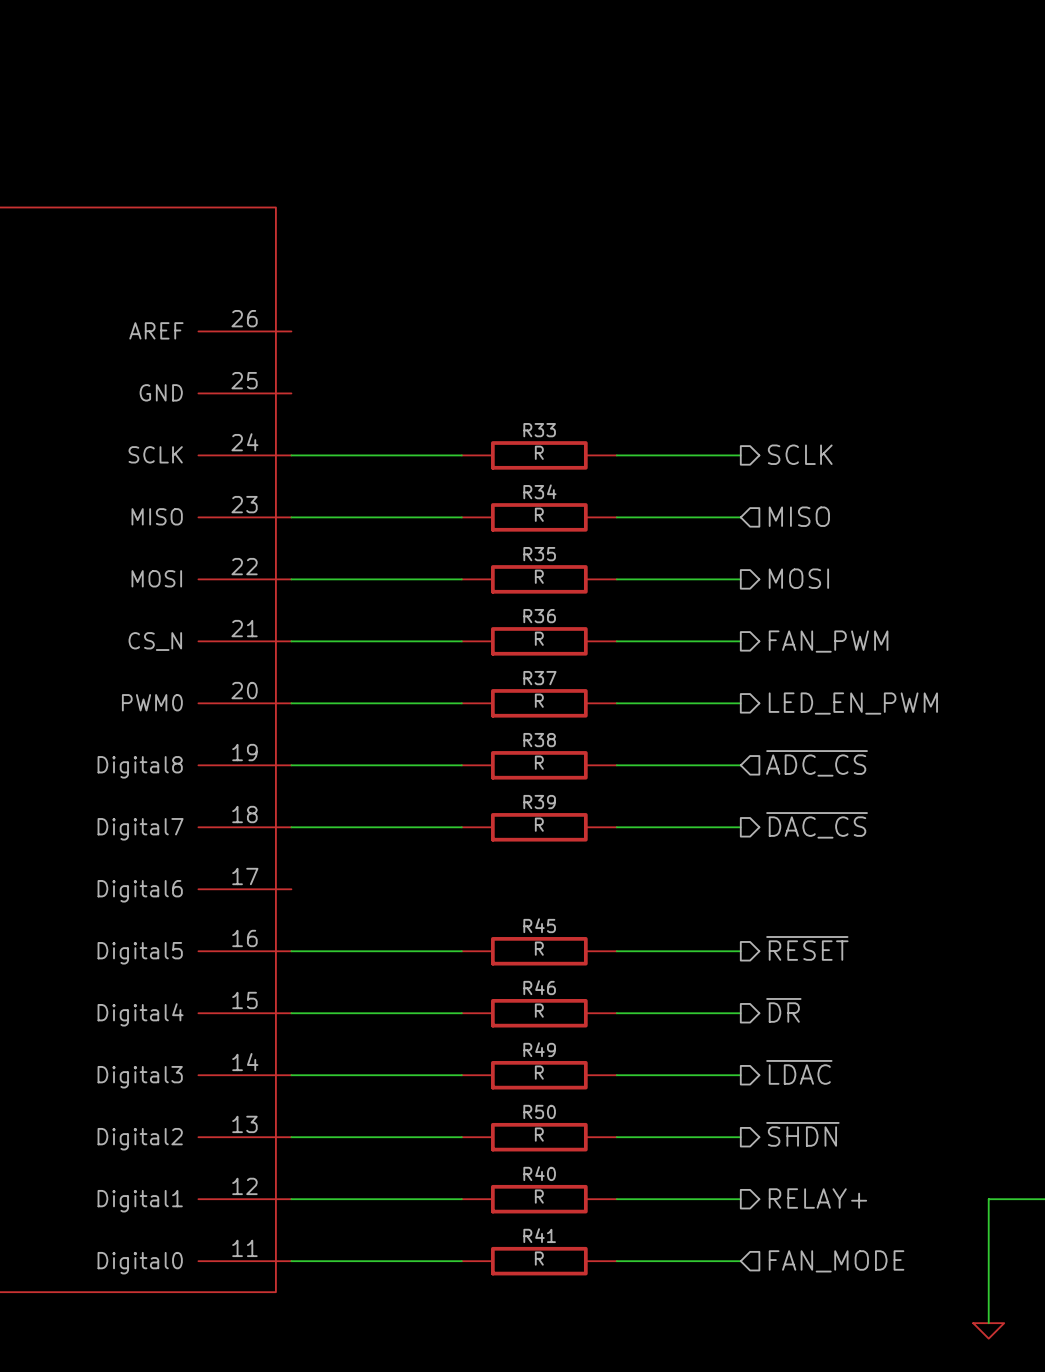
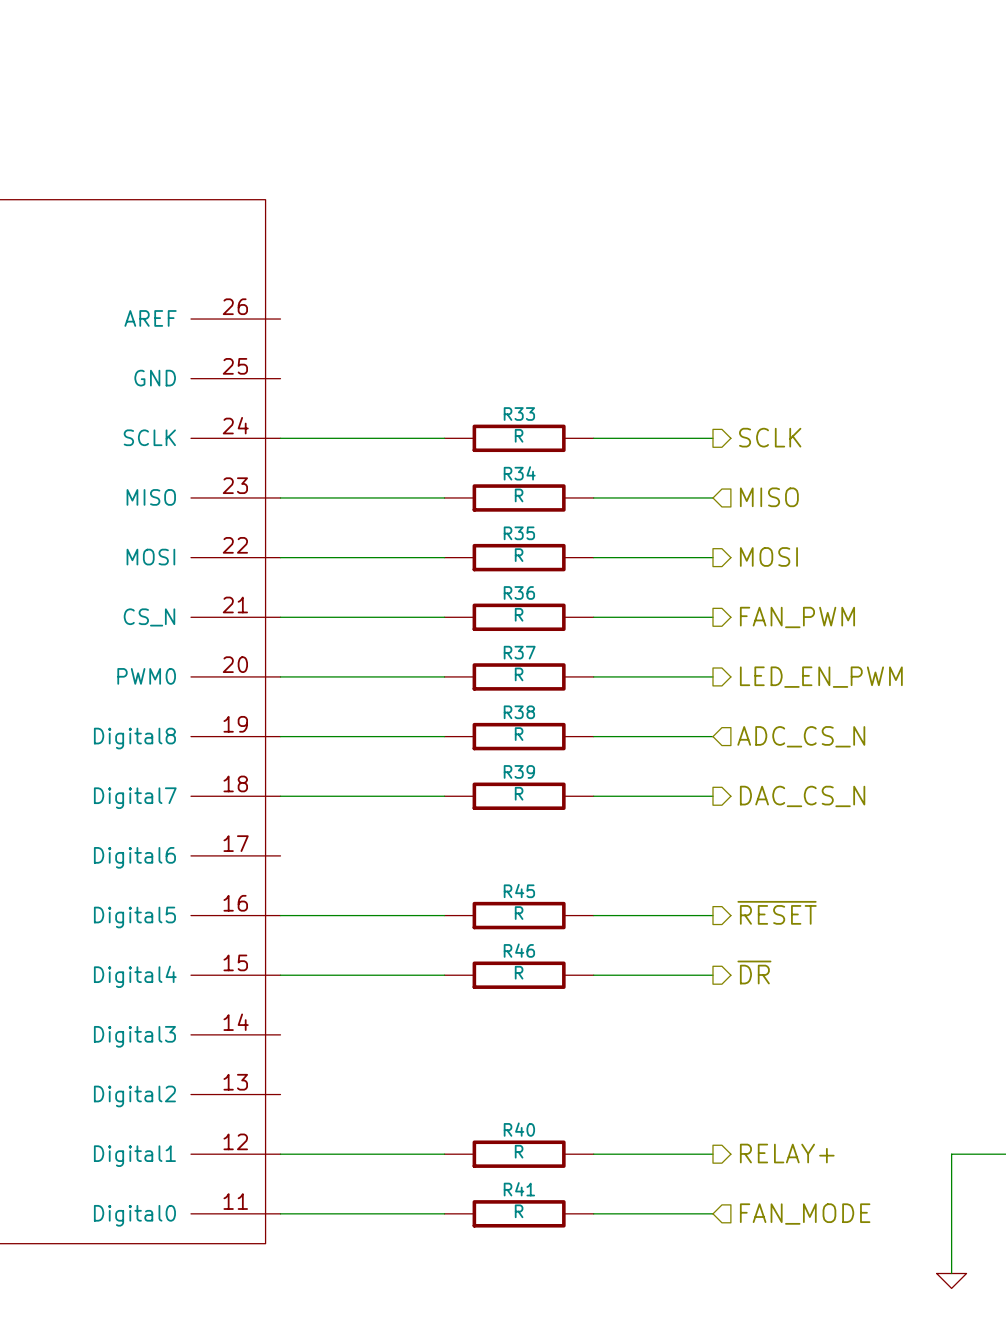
hierarchical label: ~{ADC_CS} (817, 763) -> ADC_CS_N (801, 736)
hierarchical label: ~{DAC_CS} (817, 825) -> DAC_CS_N (802, 796)
hierarchical label: ~{LDAC} (799, 1072) -> none
wire: (291, 1075) (461, 1075) -> none
R49: R (539, 1075) -> none
wire: (616, 1075) (740, 1075) -> none
hierarchical label: ~{SHDN} (802, 1134) -> none
wire: (291, 1137) (461, 1137) -> none
R50: R (539, 1137) -> none
wire: (616, 1137) (740, 1137) -> none

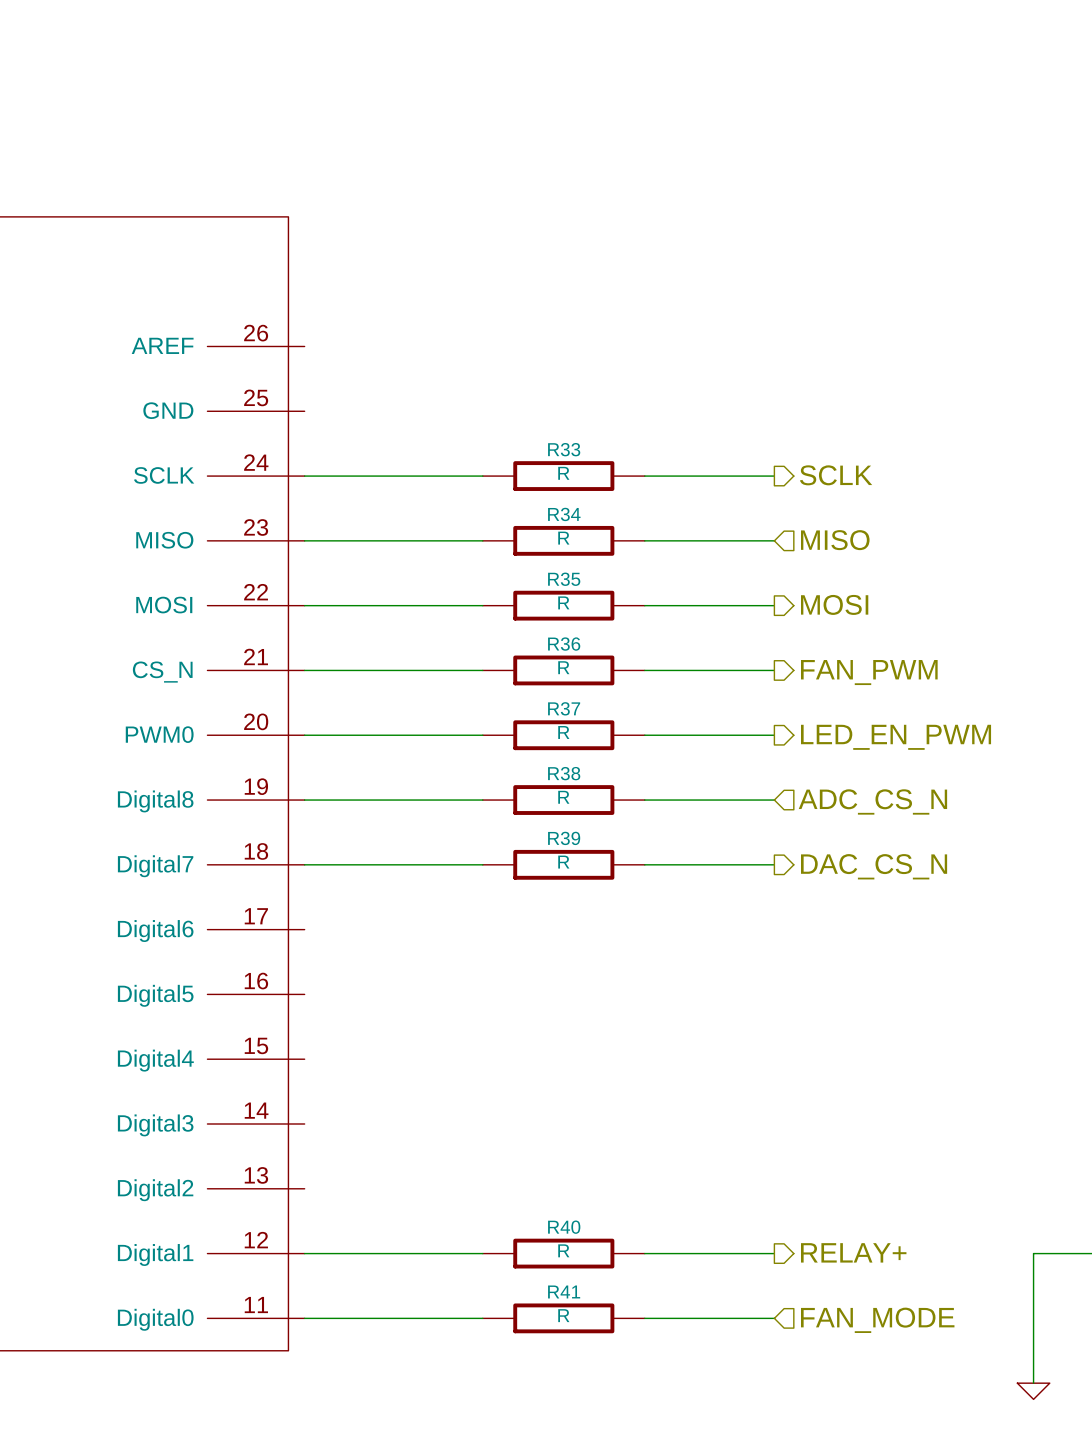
hierarchical label: ~{RESET} (777, 912) -> none
wire: (280, 915) (444, 915) -> none
R45: R (519, 915) -> none
wire: (593, 915) (712, 915) -> none
hierarchical label: ~{DR} (754, 972) -> none
wire: (280, 975) (444, 975) -> none
R46: R (519, 975) -> none
wire: (593, 975) (712, 975) -> none

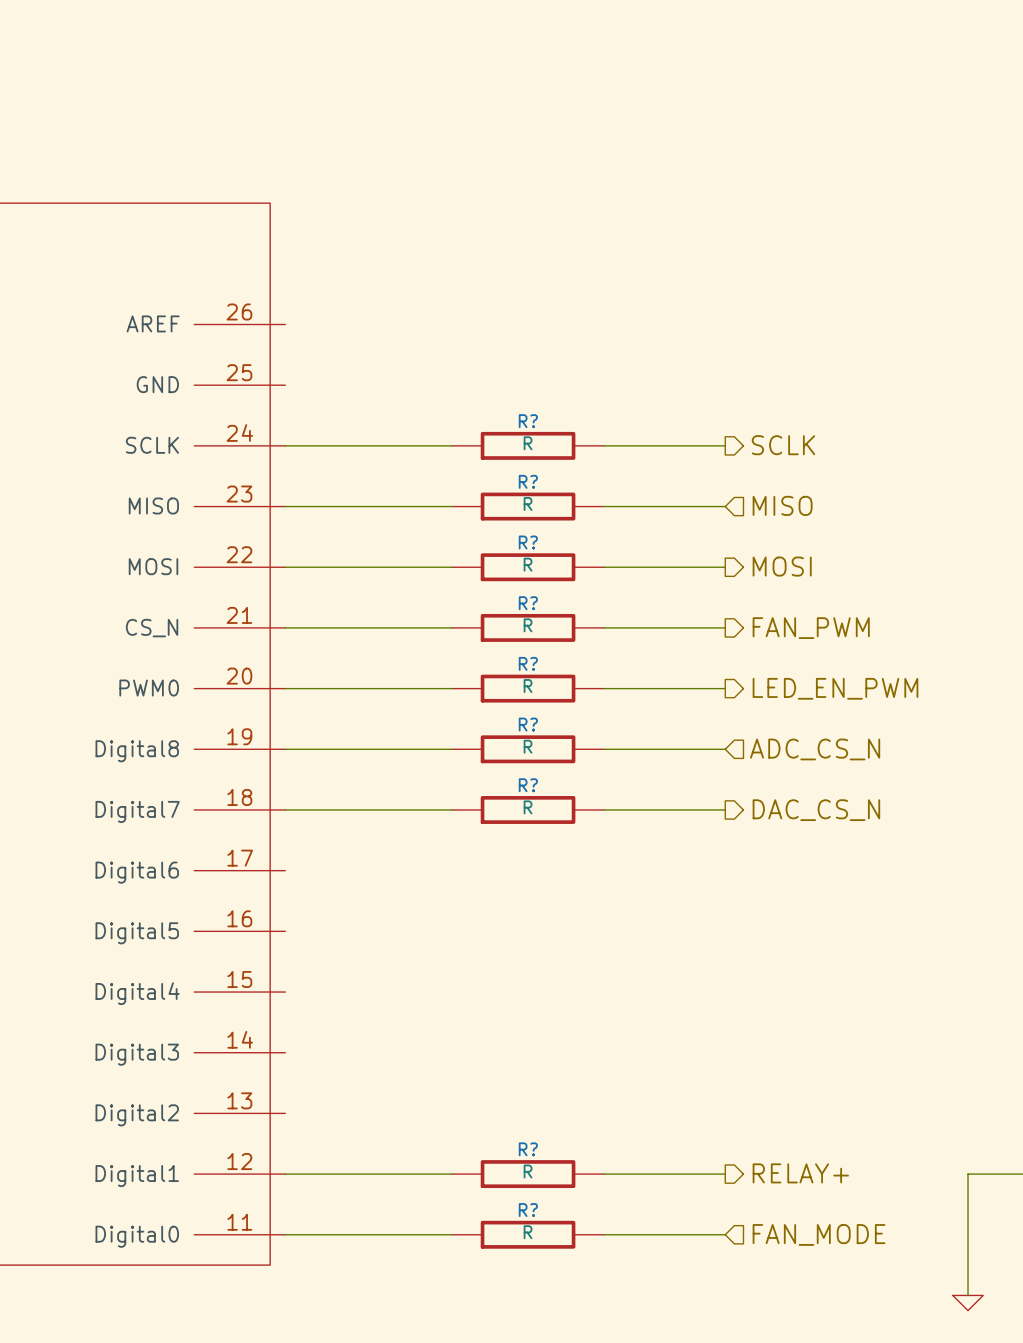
R33 name: R33 (564, 449) -> R? (528, 421)
R34 name: R34 (564, 514) -> R? (528, 481)
R35 name: R35 (564, 579) -> R? (528, 542)
R36 name: R36 (564, 644) -> R? (528, 603)
R37 name: R37 (564, 708) -> R? (528, 663)
R38 name: R38 (564, 773) -> R? (528, 724)
R39 name: R39 (564, 838) -> R? (528, 785)
R40 name: R40 (564, 1227) -> R? (528, 1149)
R41 name: R41 (564, 1291) -> R? (528, 1210)

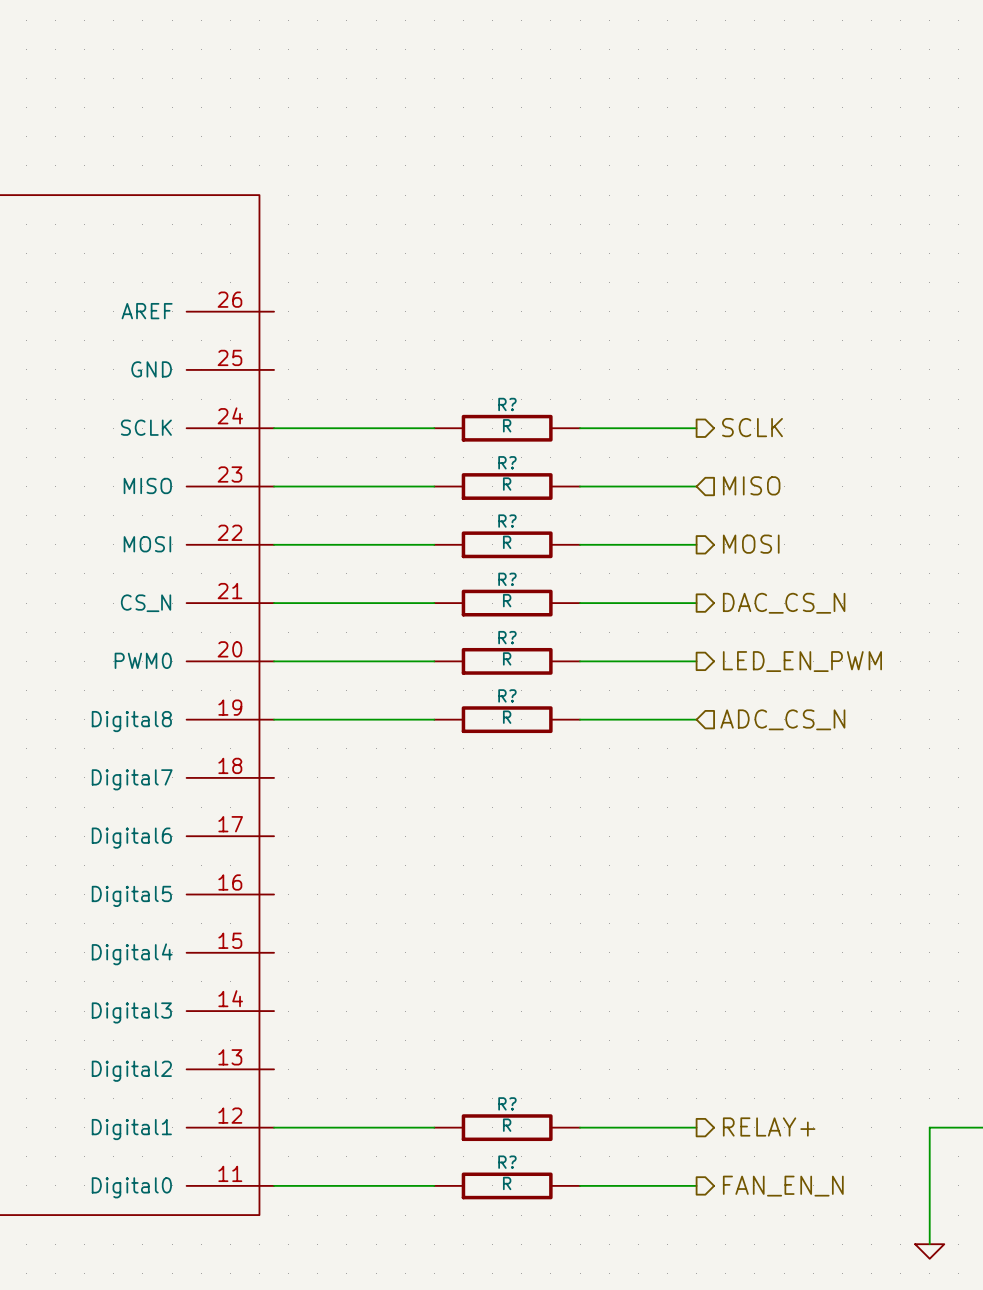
hierarchical label: FAN_PWM (811, 628) -> DAC_CS_N (784, 603)
wire: (285, 809) (452, 809) -> none
R?: R (528, 809) -> none
wire: (603, 809) (725, 809) -> none
hierarchical label: DAC_CS_N (816, 810) -> none
hierarchical label shape: input (819, 1234) -> output (783, 1186)
hierarchical label: FAN_MODE (819, 1234) -> FAN_EN_N (783, 1186)

